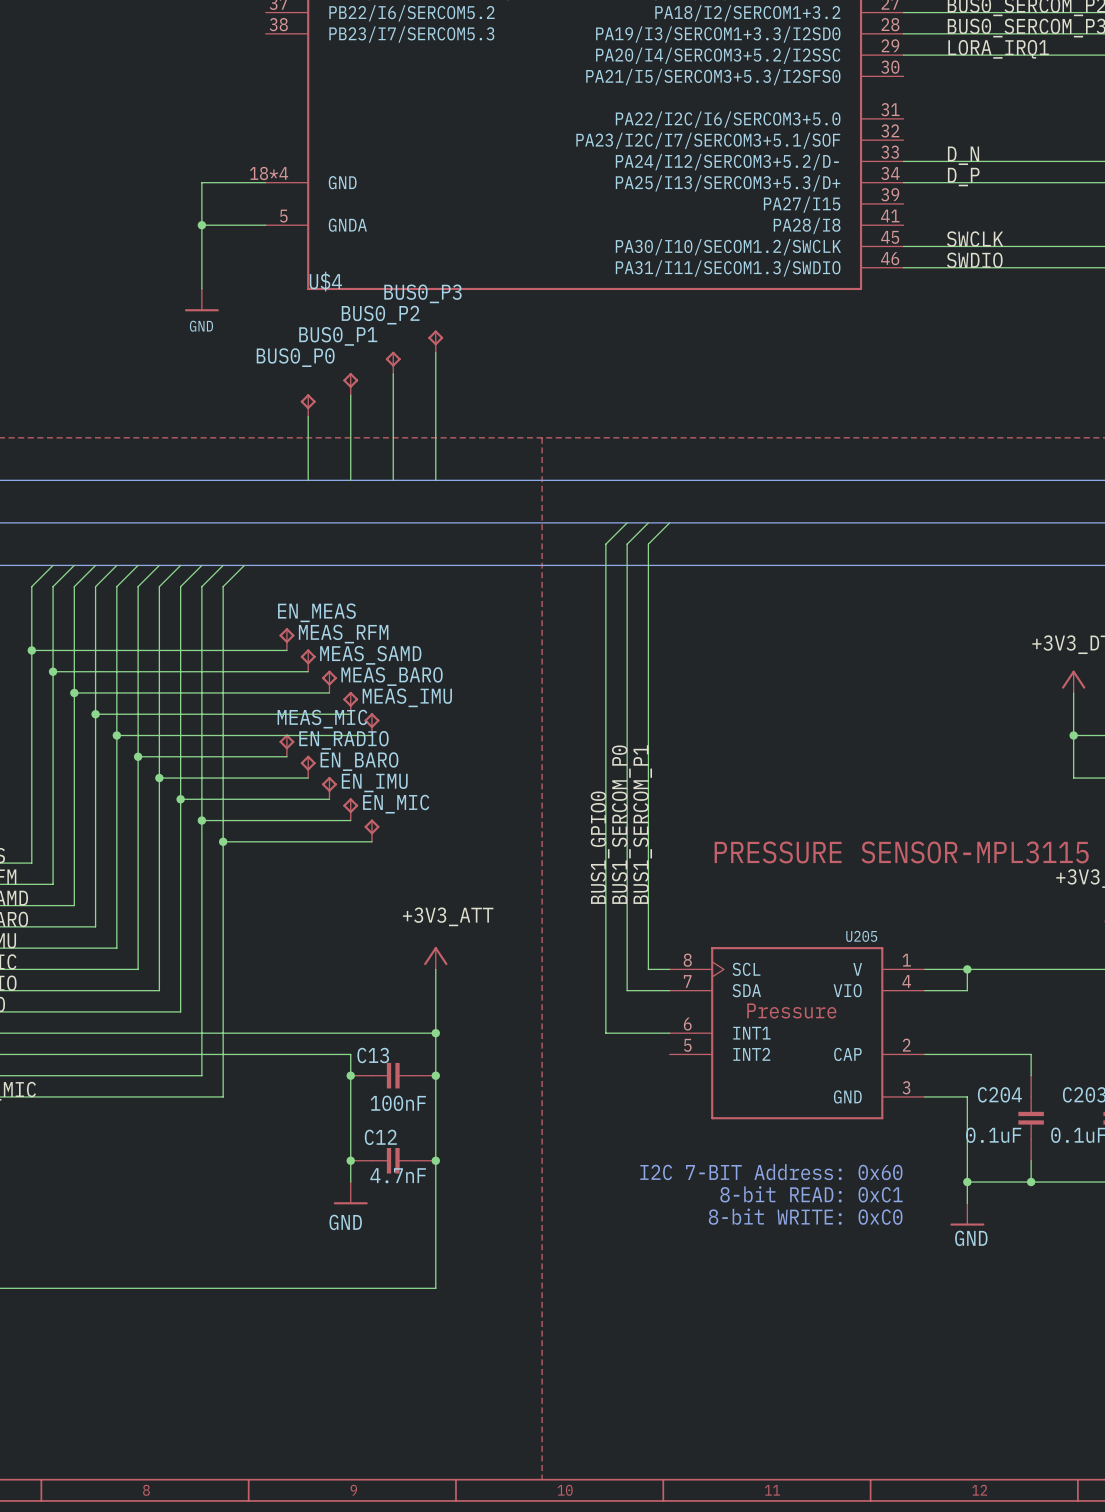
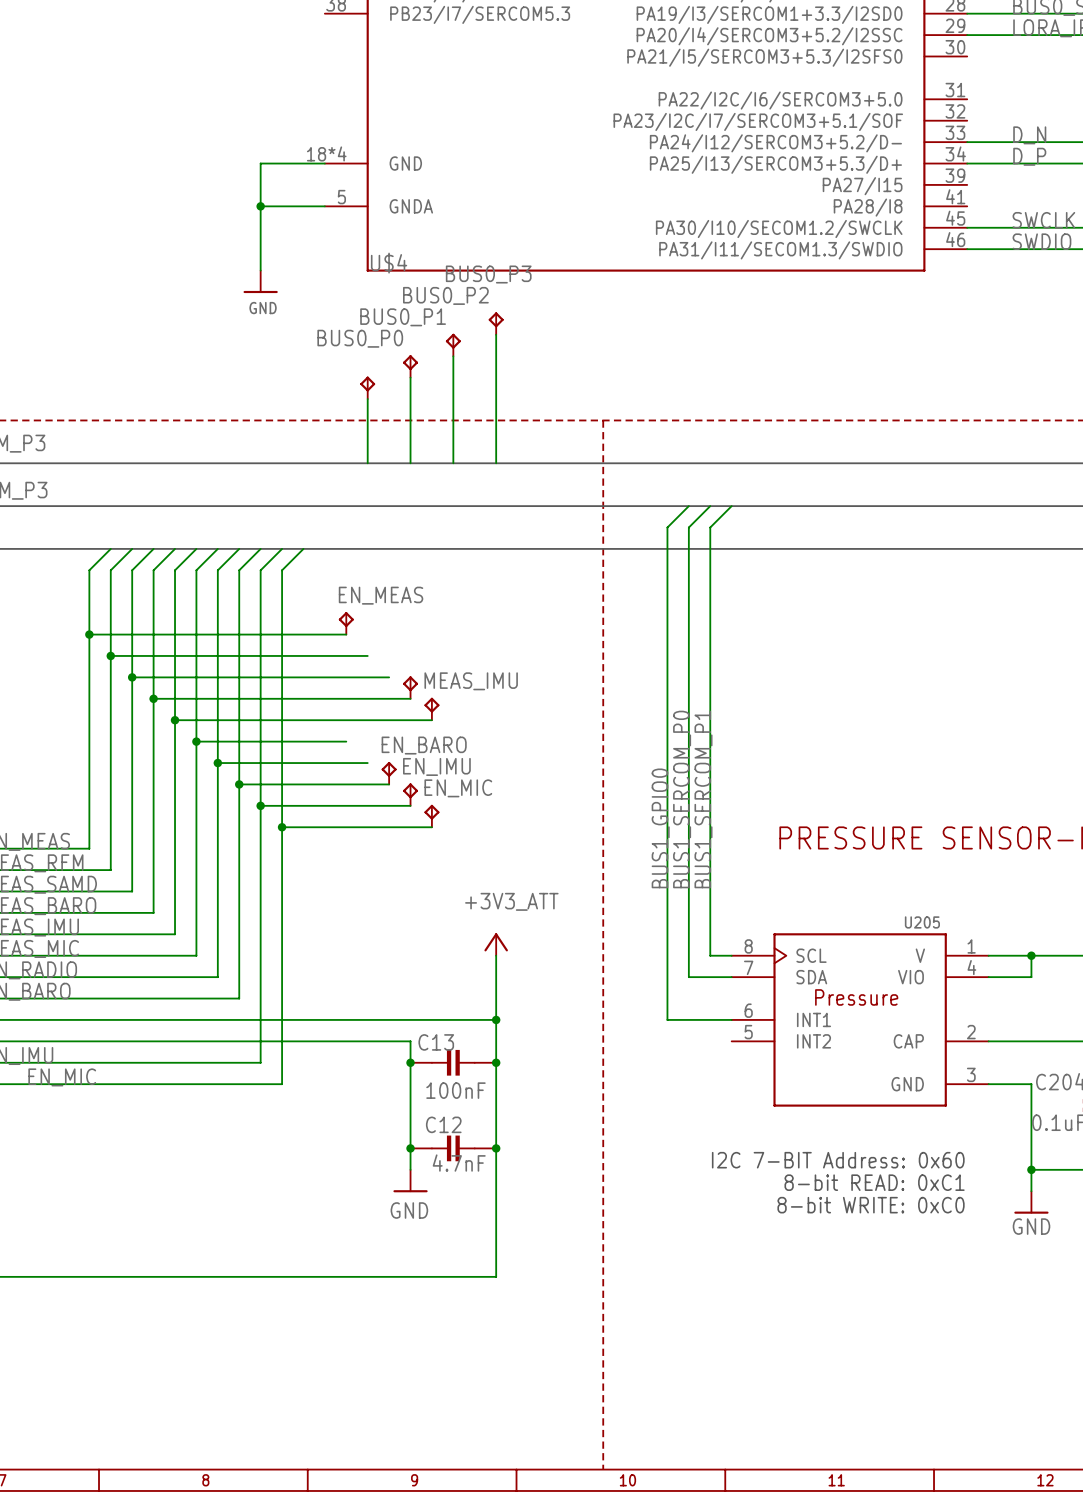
MEAS_RFM: (308, 660) -> none
MEAS_BARO name: MEAS_BARO (392, 676) -> none
MEAS_SAMD: (329, 681) -> none
MEAS_MIC: (286, 745) -> none
EN_RADIO: (308, 766) -> none

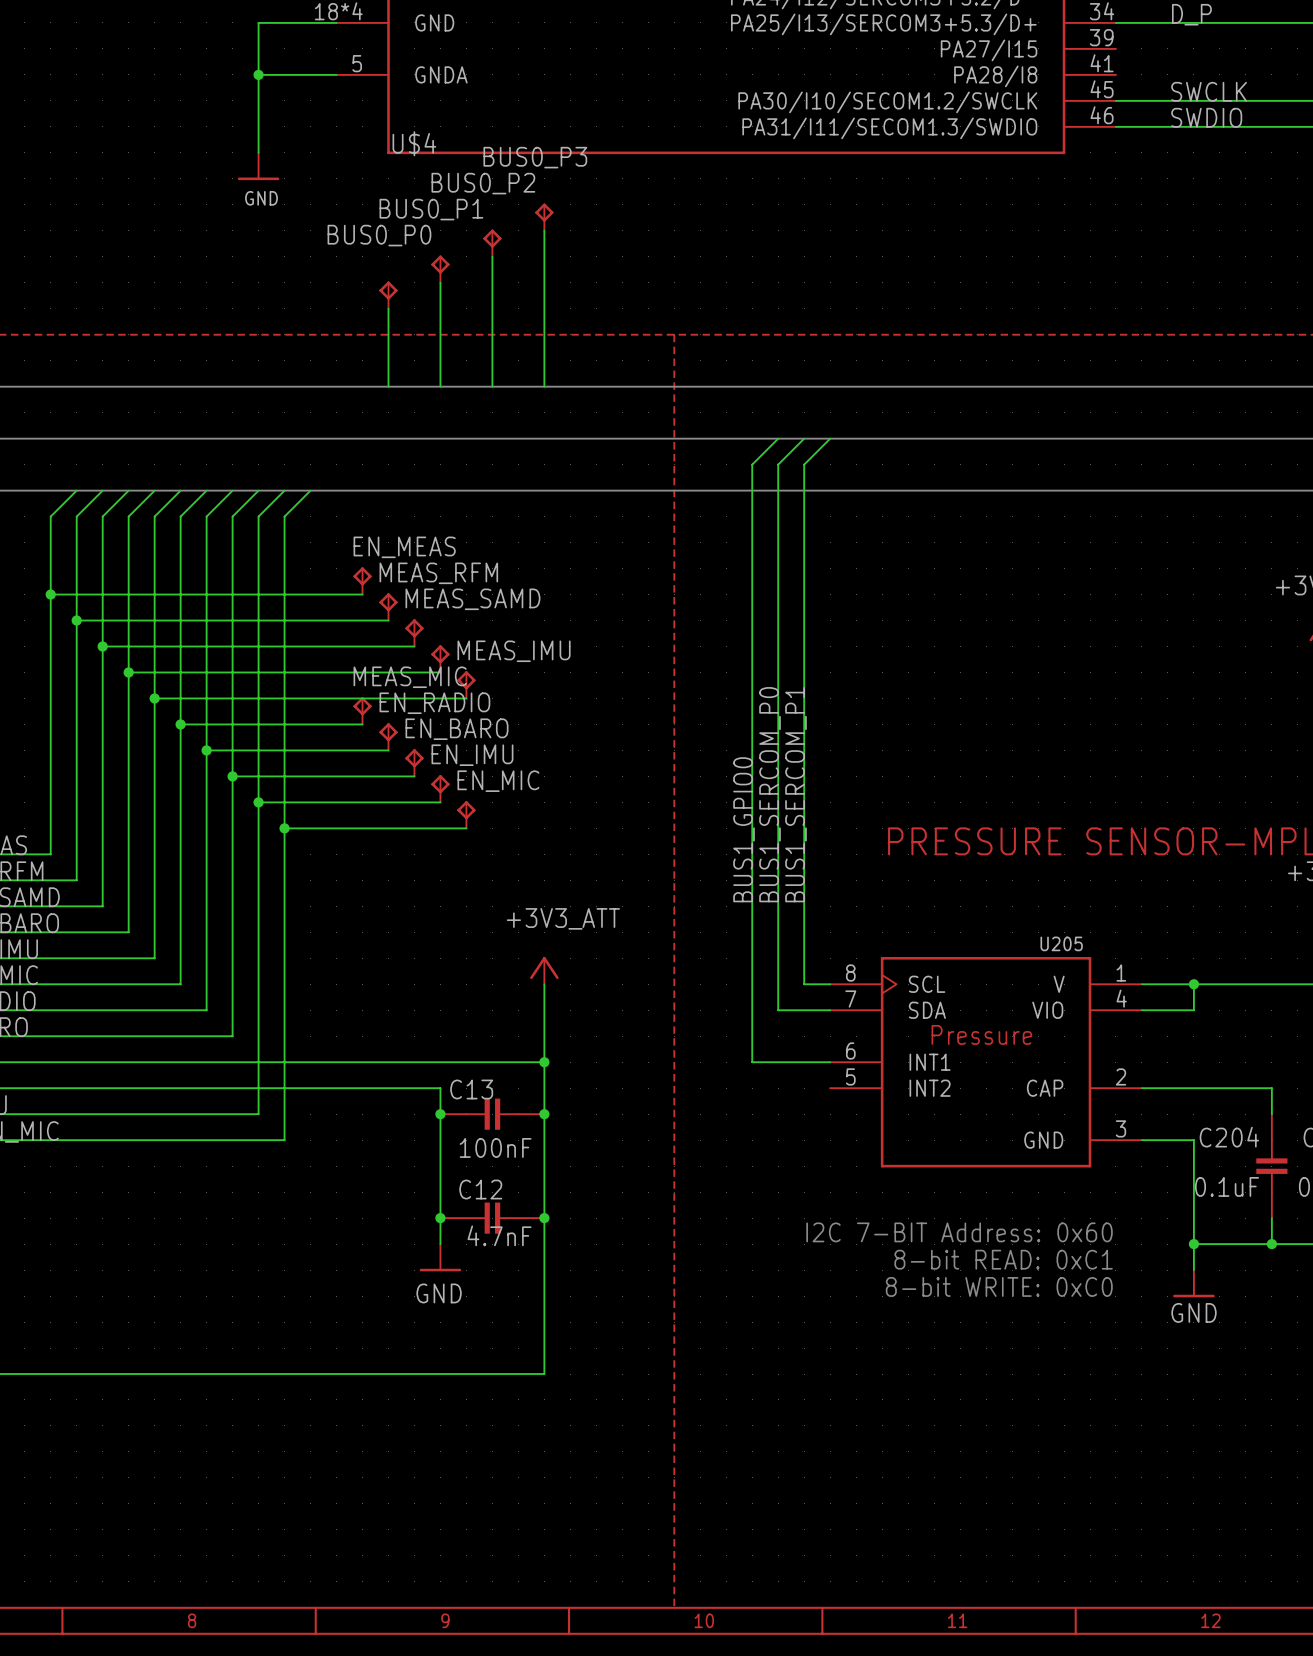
MEAS_RFM: none -> (388, 606)
MEAS_SAMD: none -> (414, 632)
MEAS_MIC: none -> (362, 710)
EN_RADIO: none -> (388, 736)

